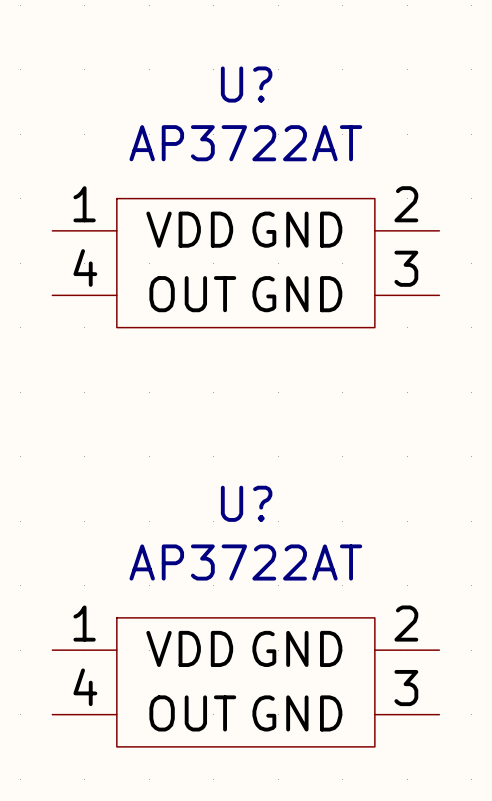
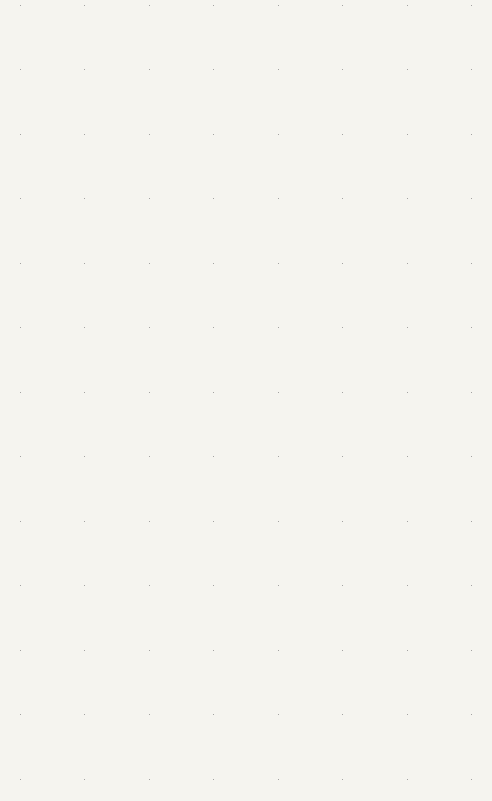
U?: AP3722AT (245, 263) -> none
U?: AP3722AT (245, 682) -> none

